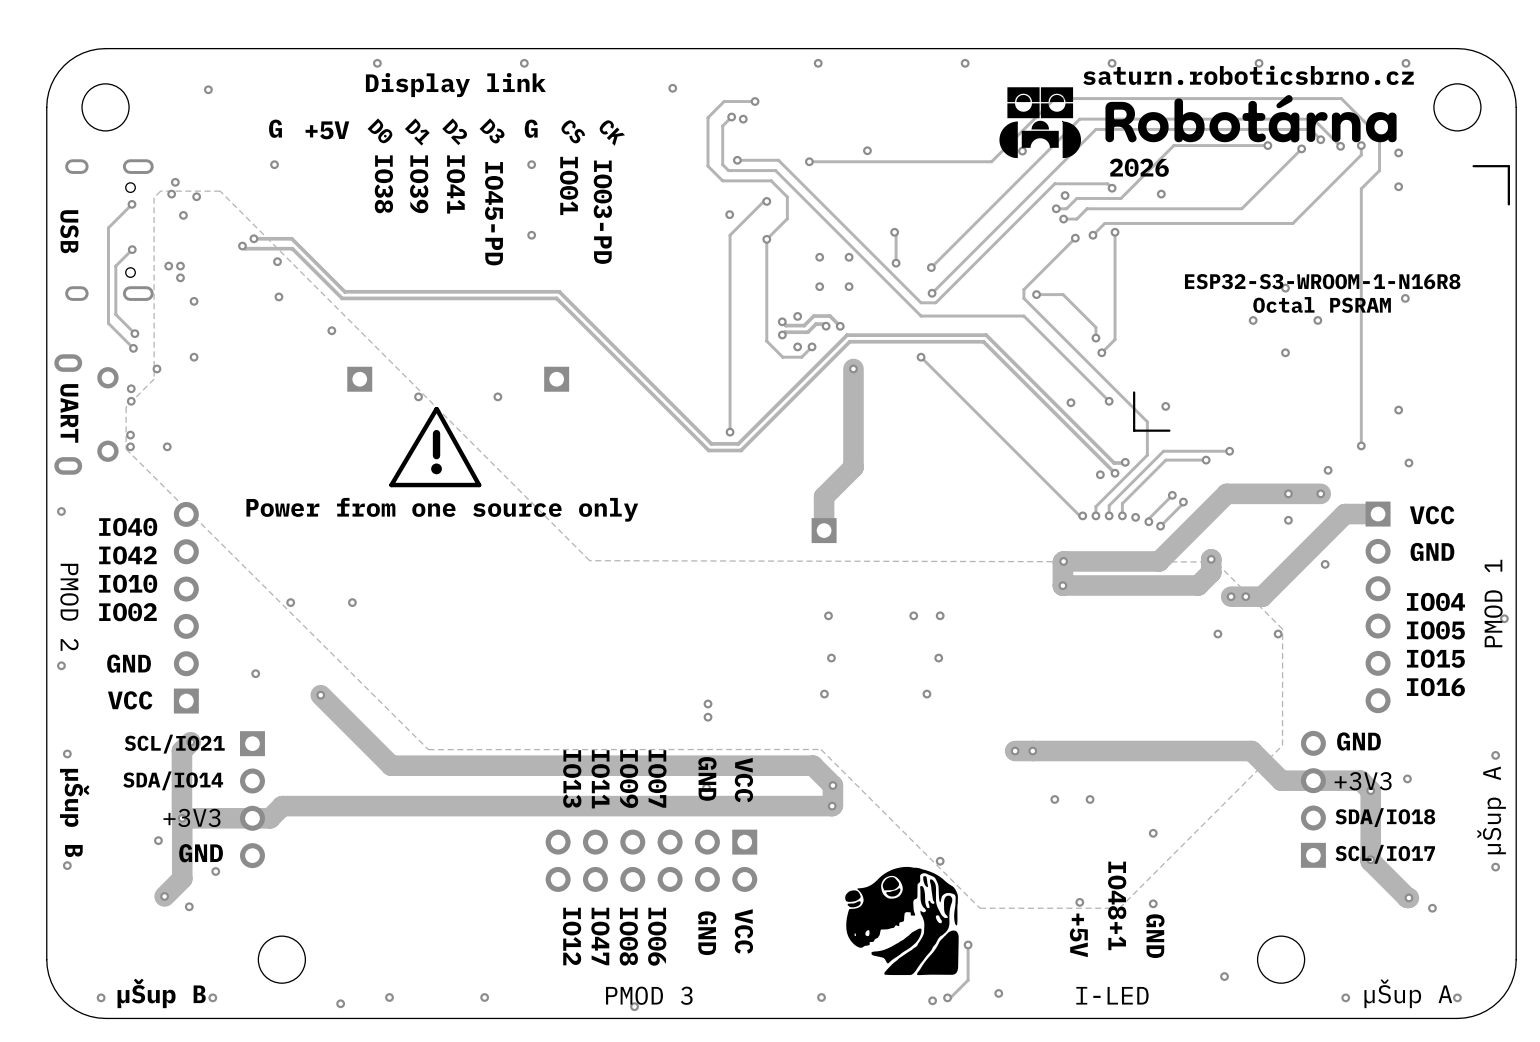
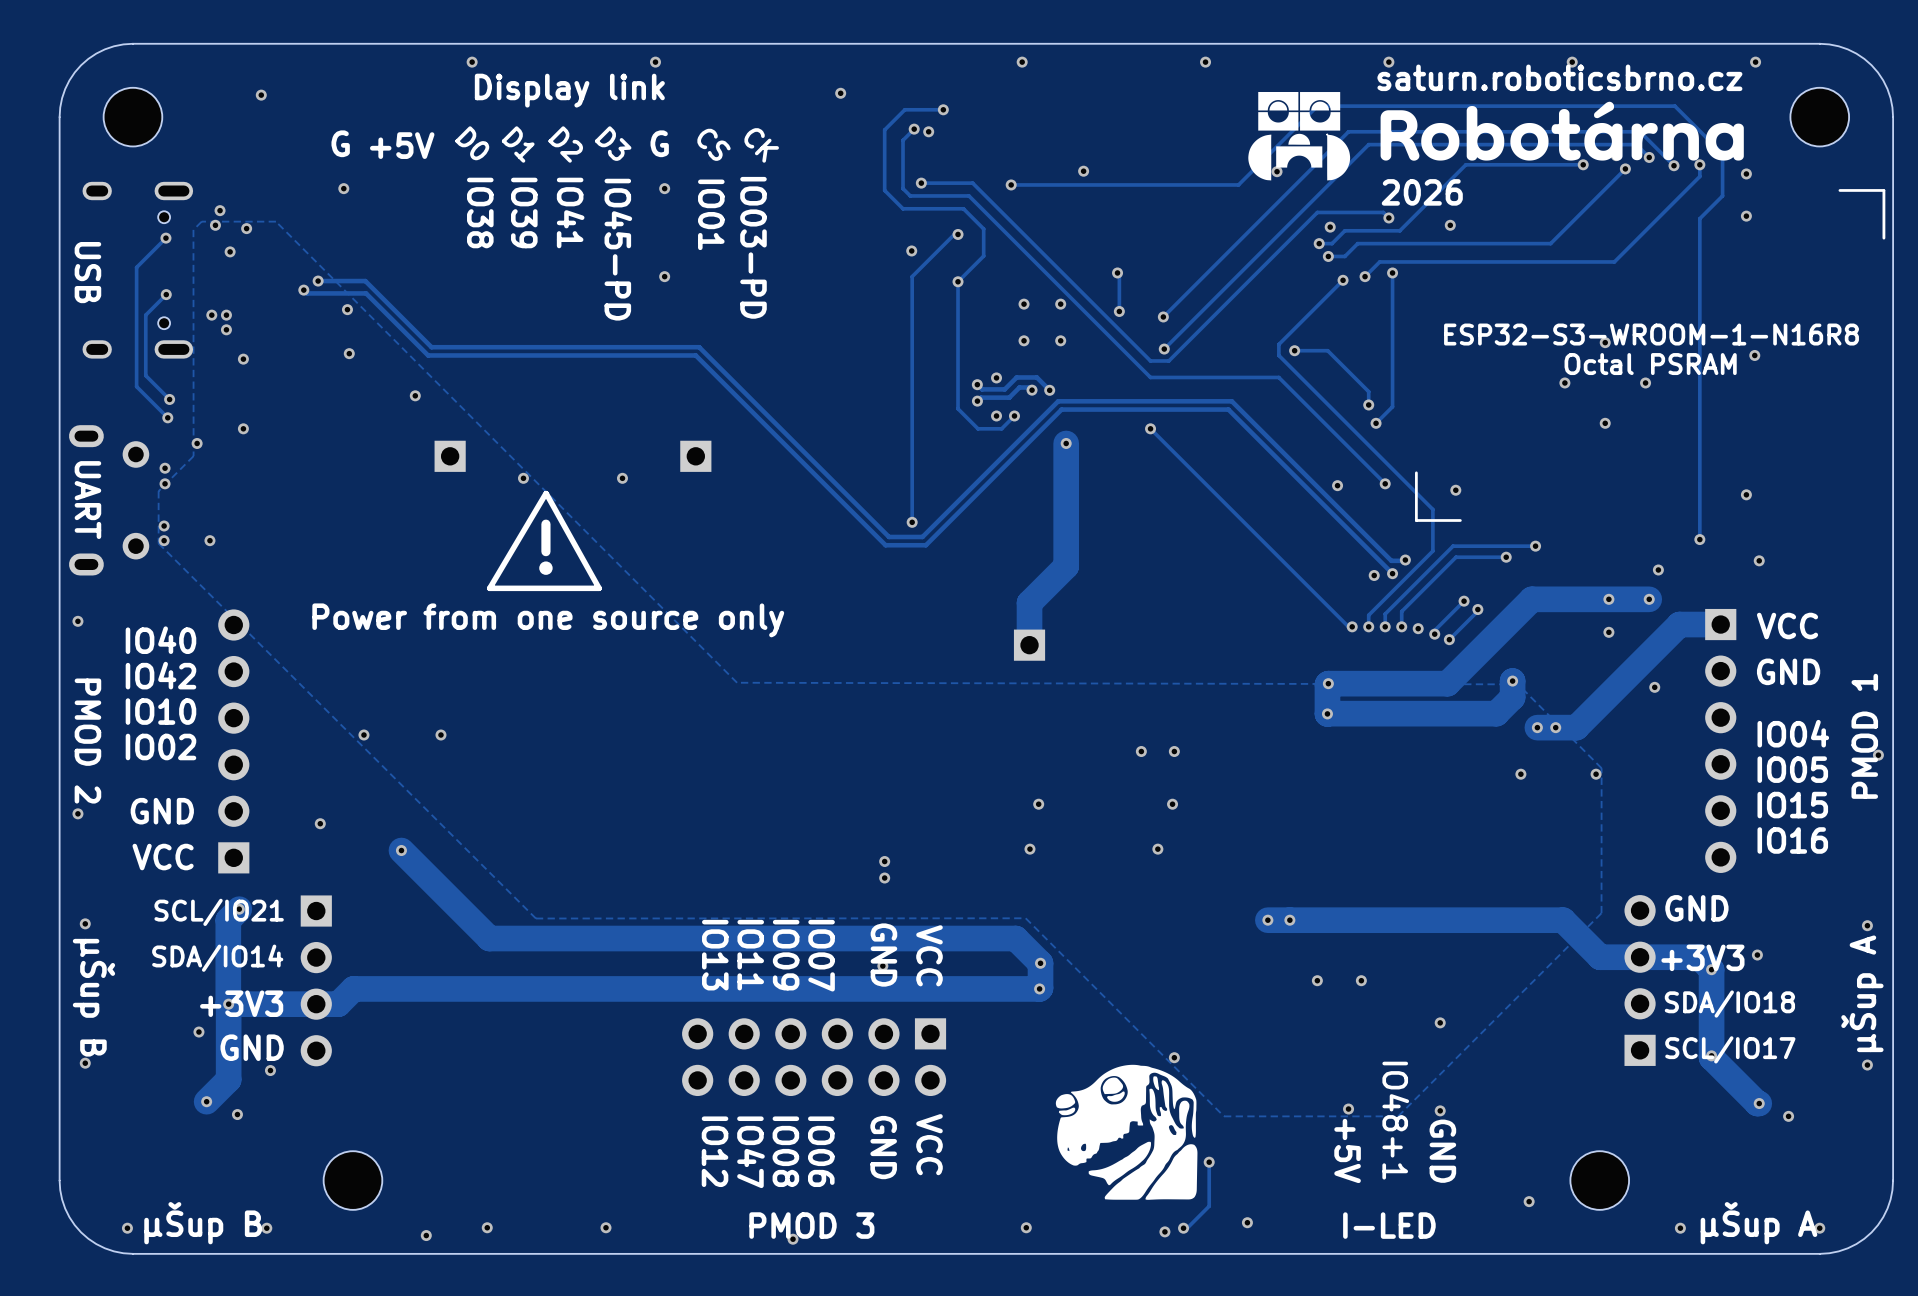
via: (828, 615) -> none

